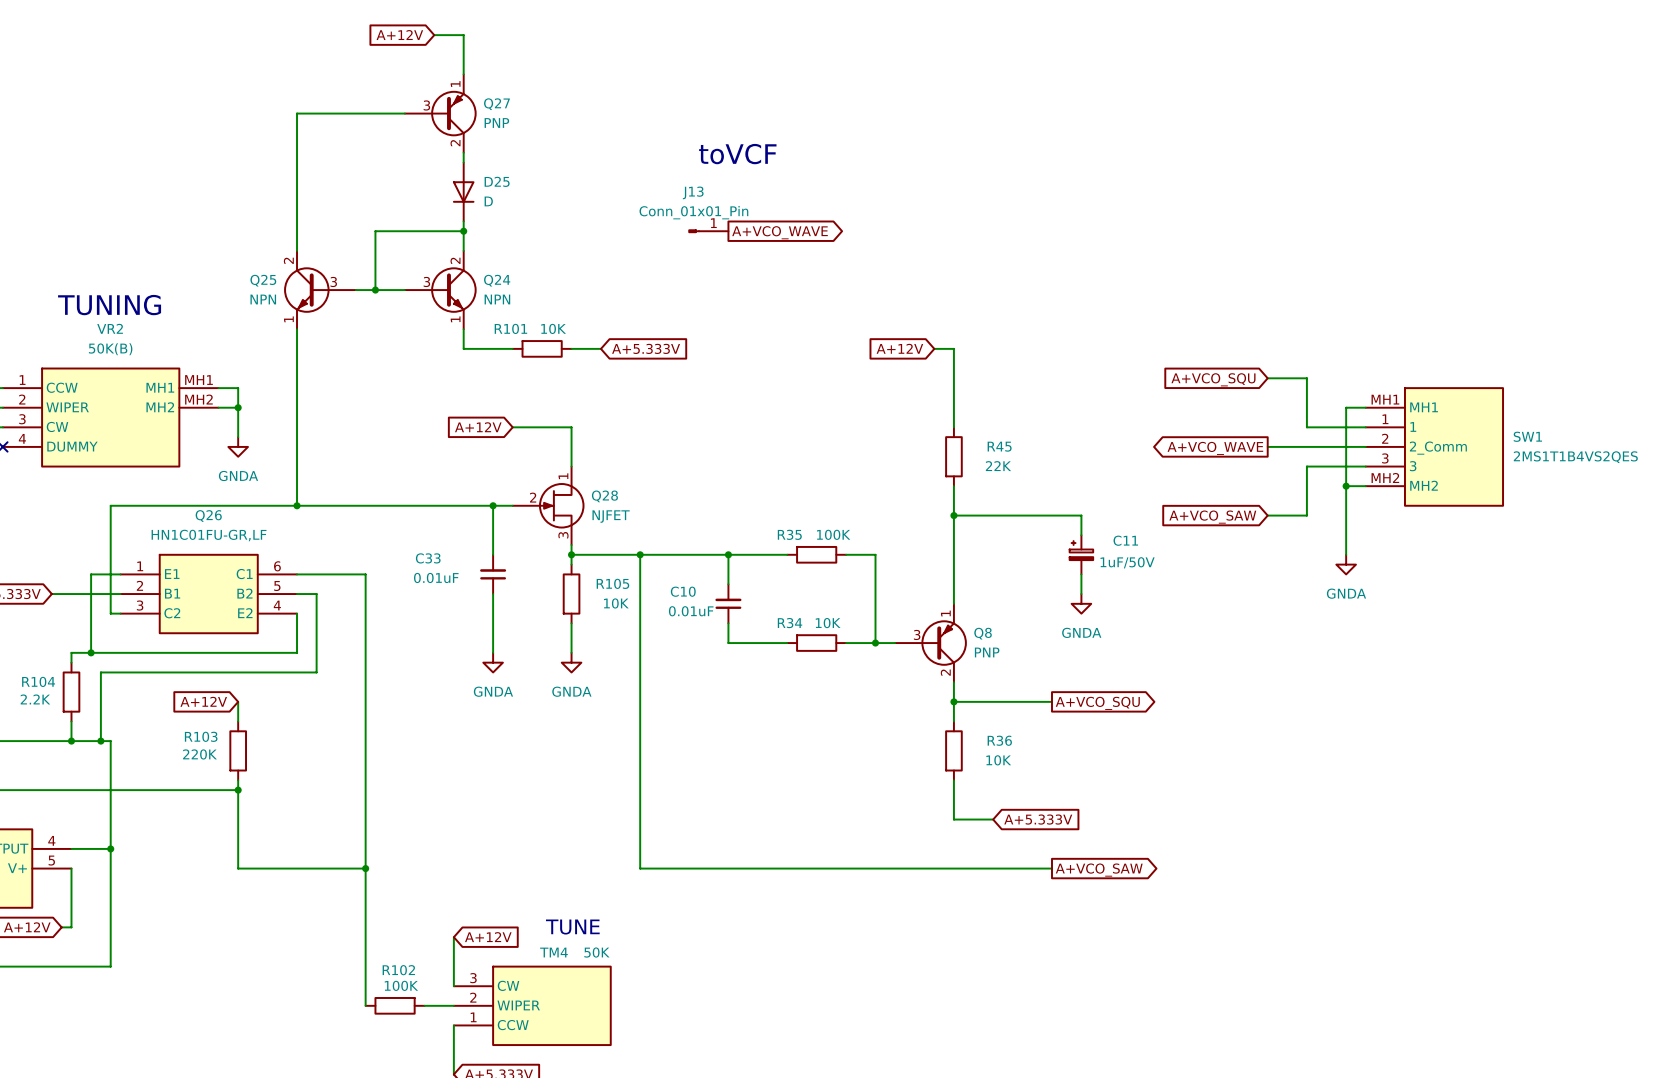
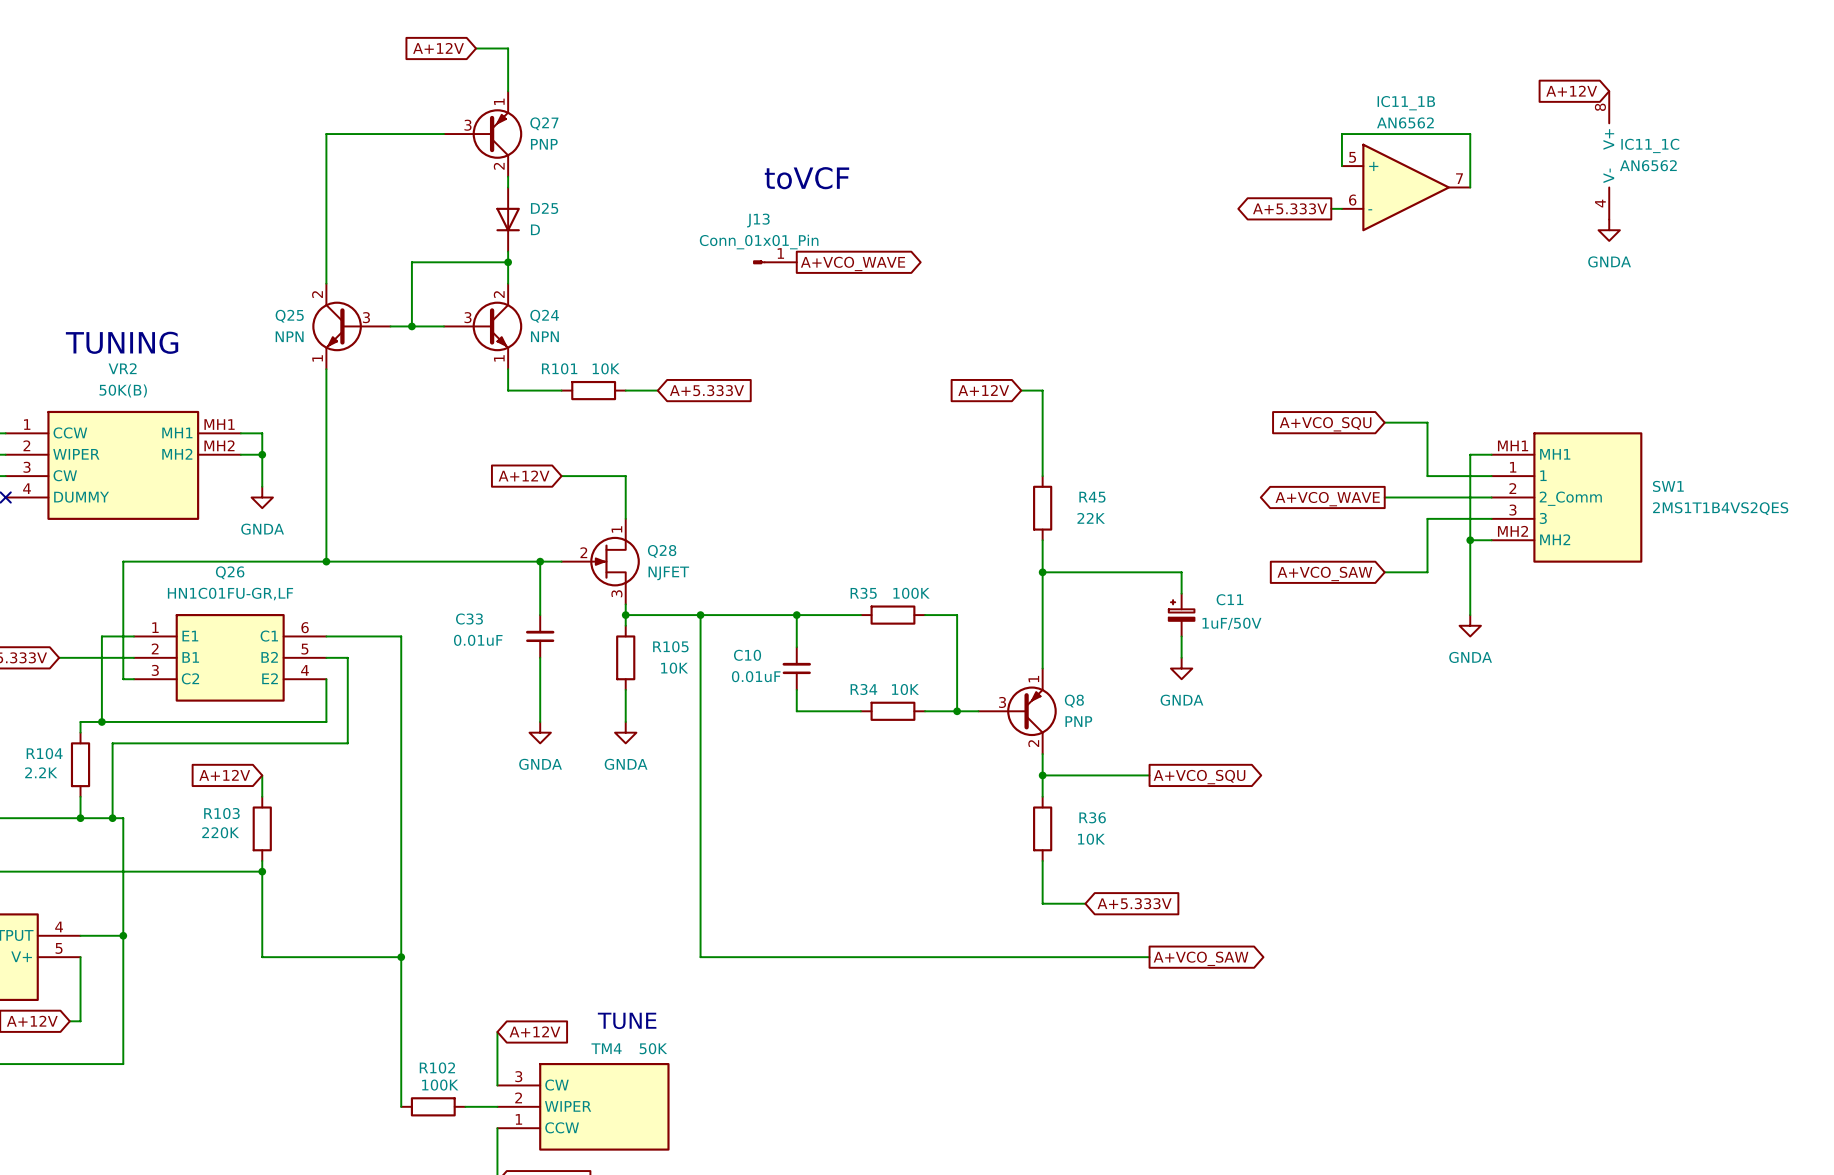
global label: none -> A+12V (1571, 91)
IC11_1C: none -> AN6562 (1609, 155)
wire: none -> (1341, 166) (1341, 134) (1470, 134) (1470, 187)
IC11_1B: none -> AN6562 (1406, 187)
global label: none -> A+5.333V (1290, 208)
wire: none -> (1331, 208) (1341, 208)
power symbol: none -> GNDA (1609, 230)

